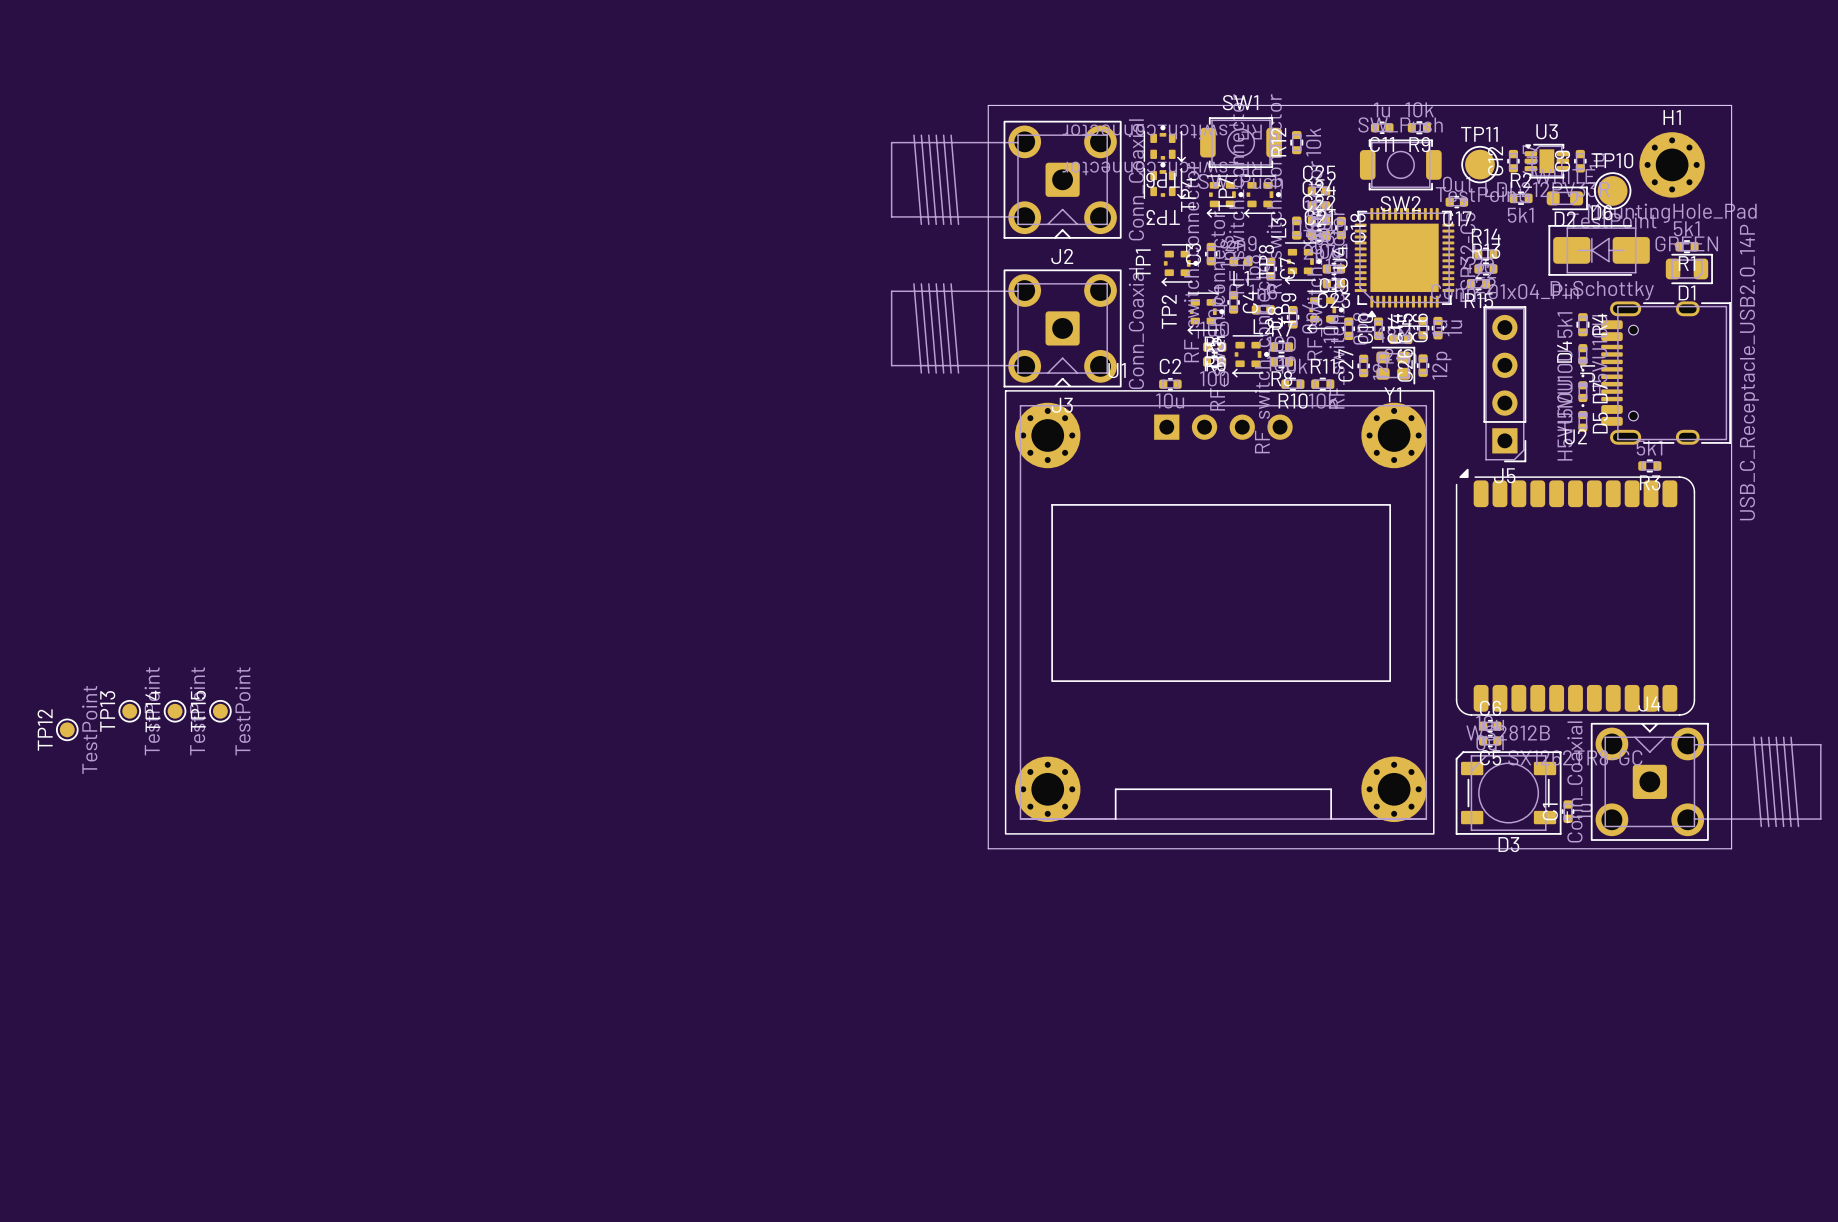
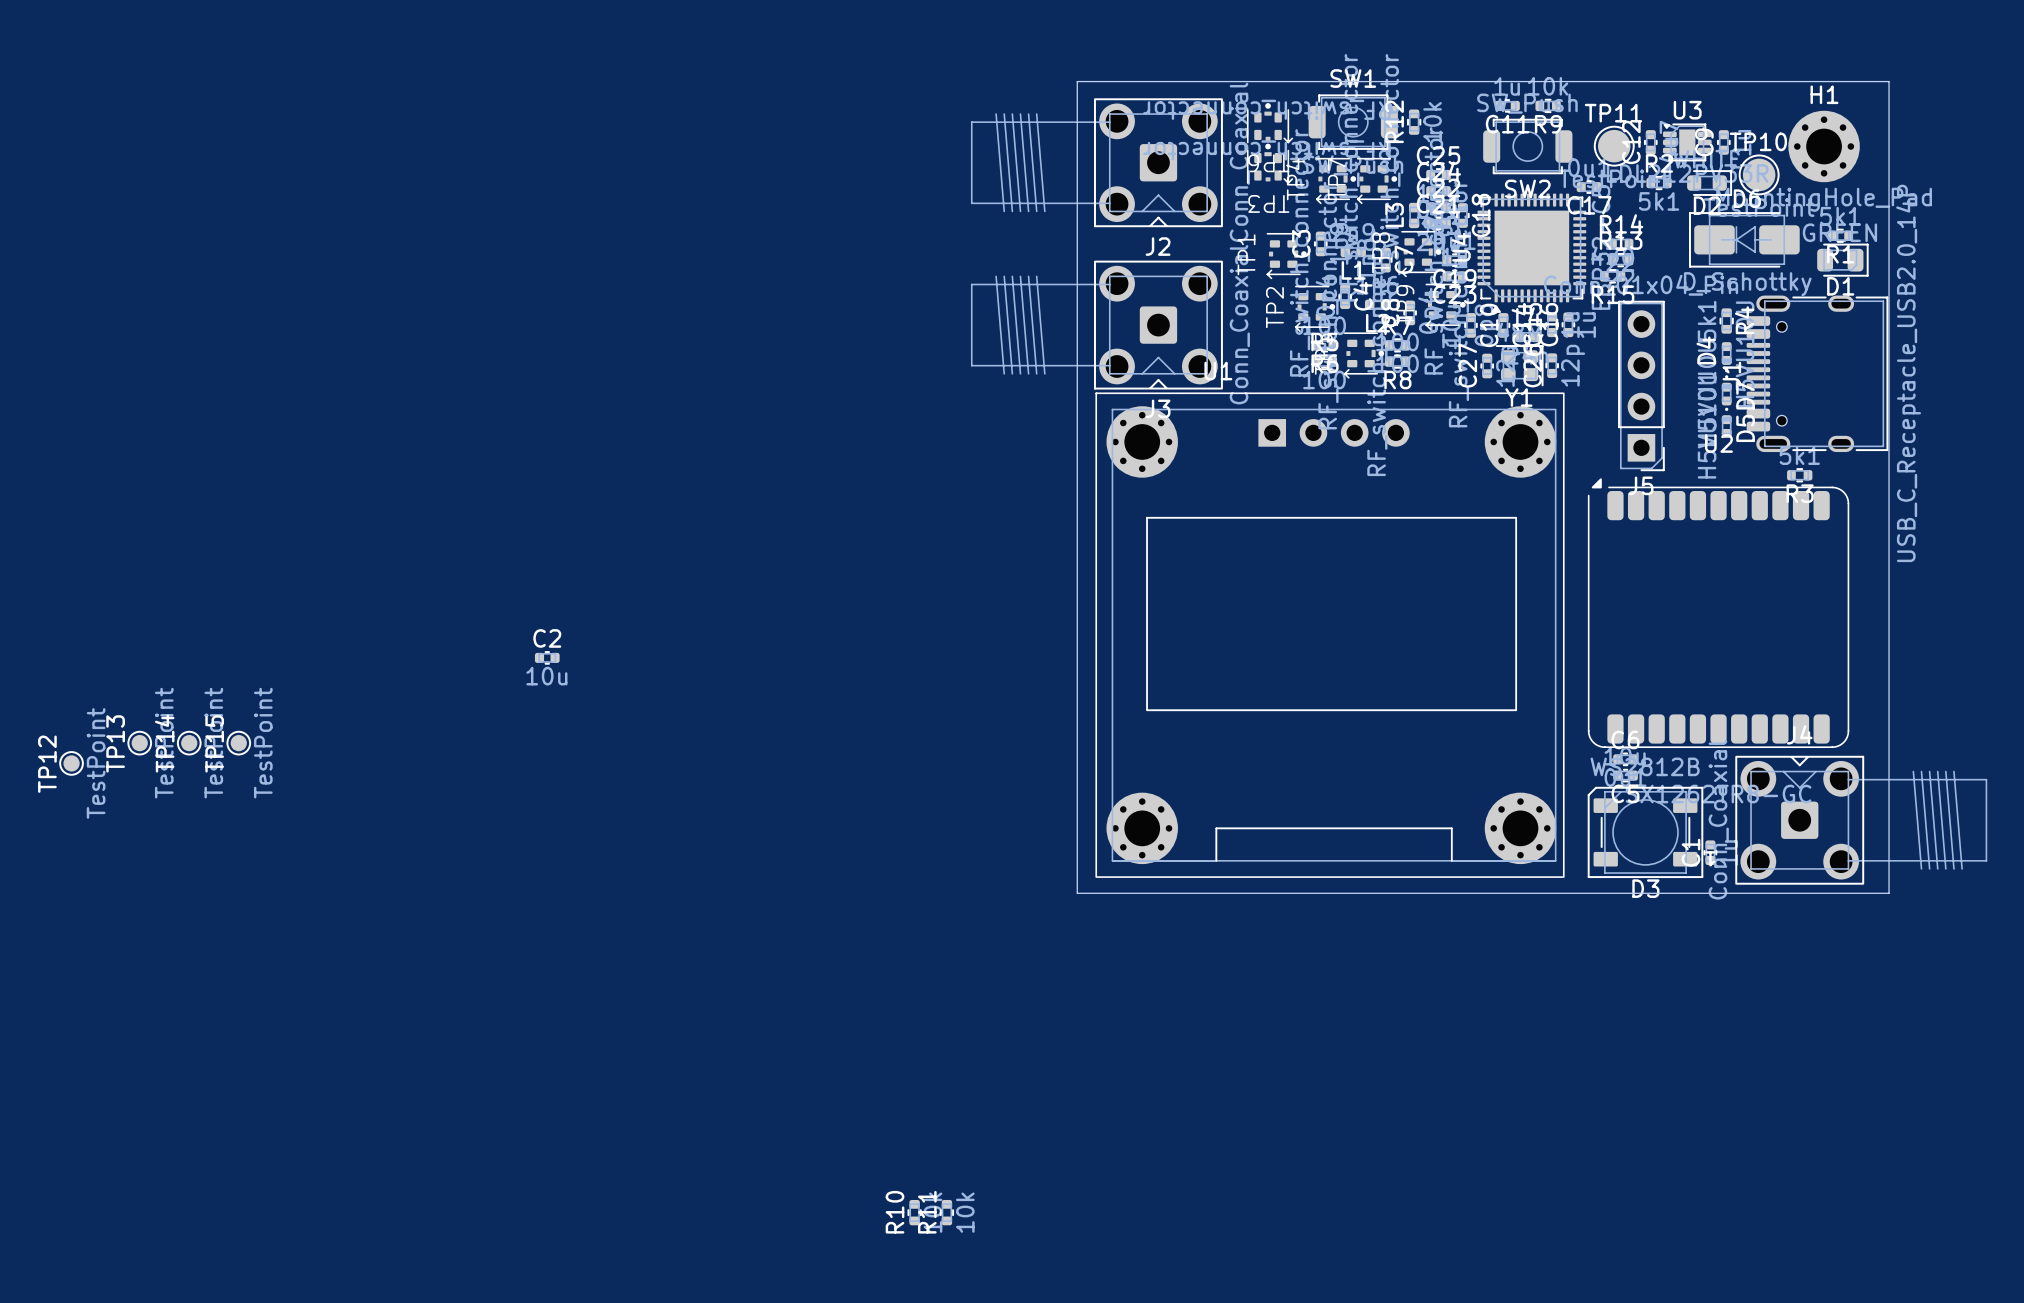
C2 position: (1170, 384) -> (547, 657)
R10 rotation: 0° (1292, 384) -> 90° clockwise (914, 1212)
R10 position: (1292, 384) -> (914, 1212)
R11 rotation: 0° (1322, 384) -> 90° clockwise (946, 1212)
R11 position: (1322, 384) -> (946, 1212)

